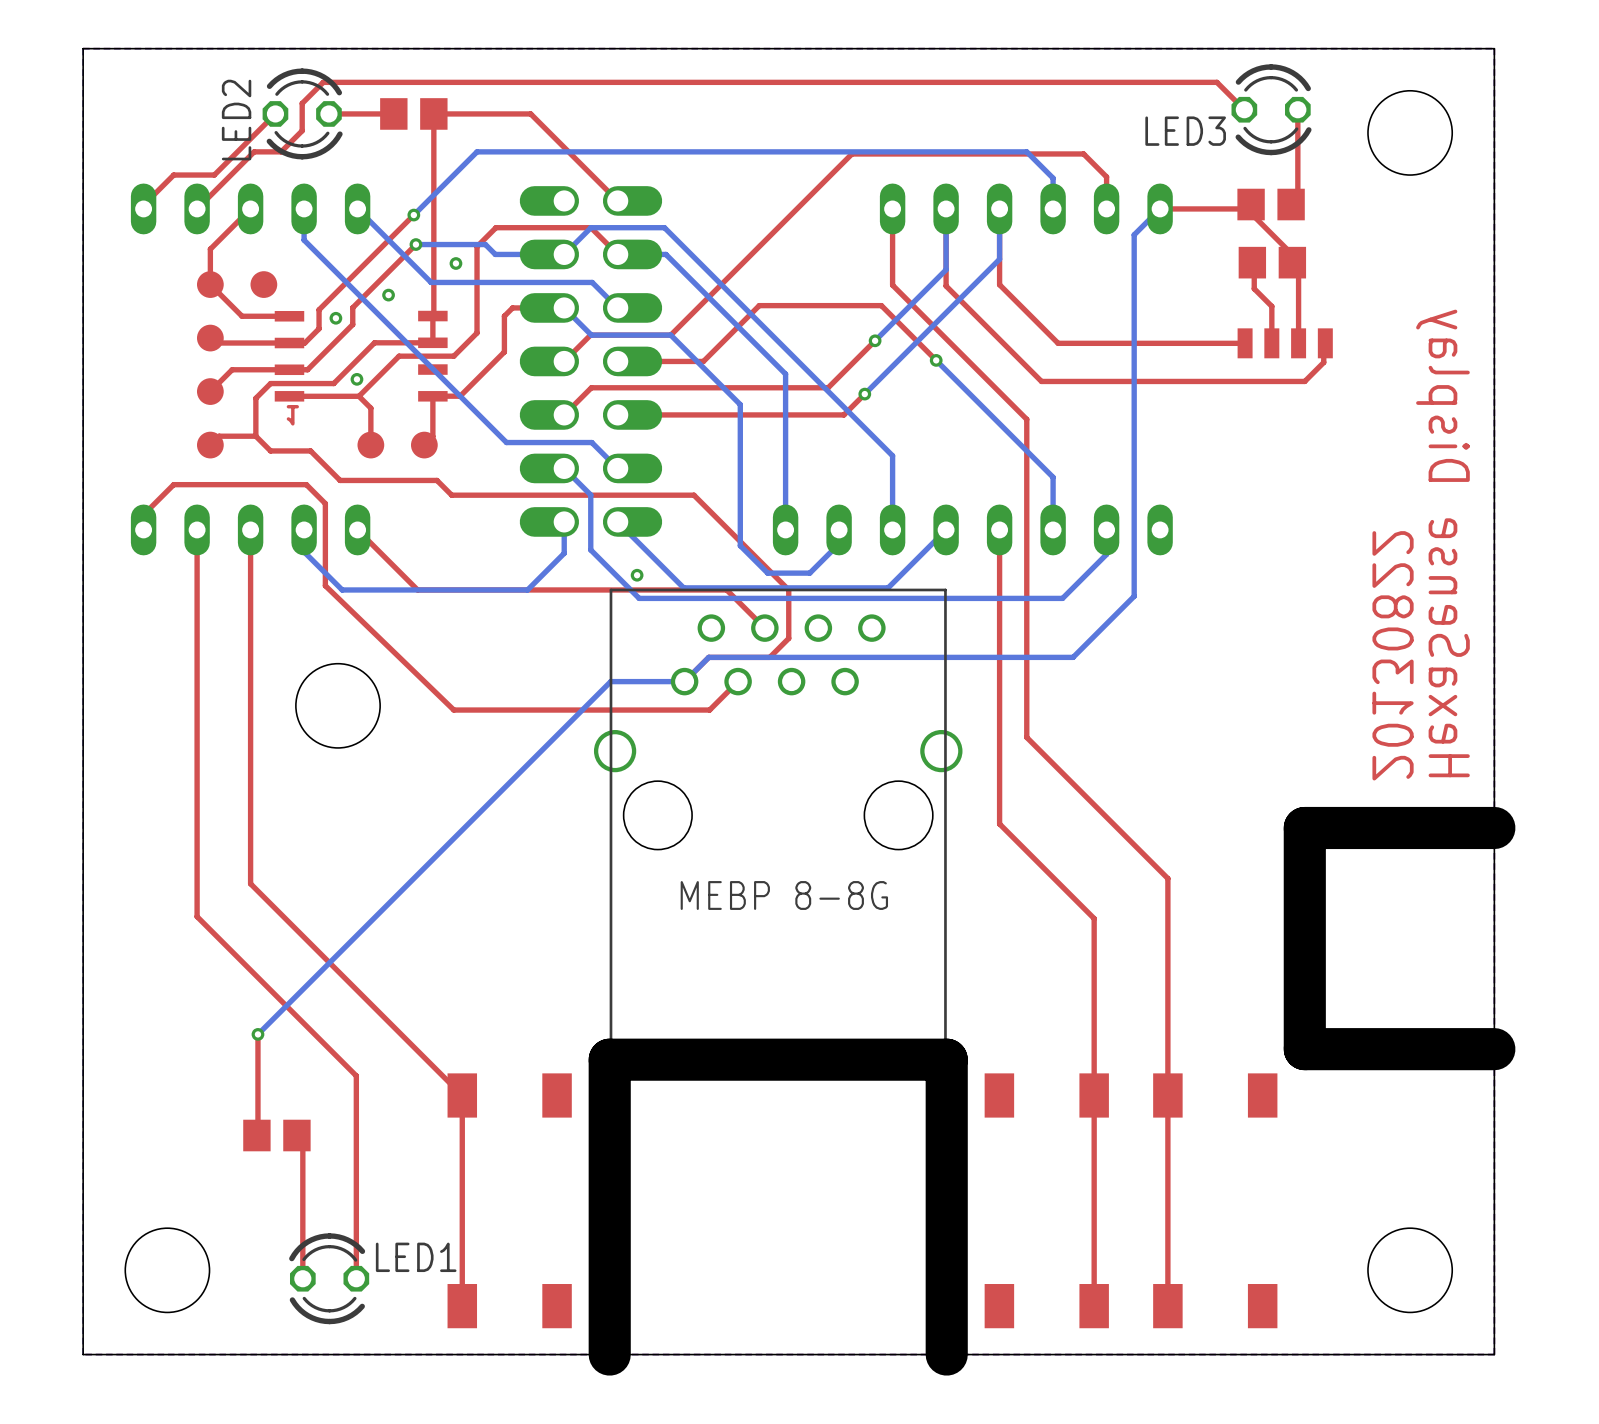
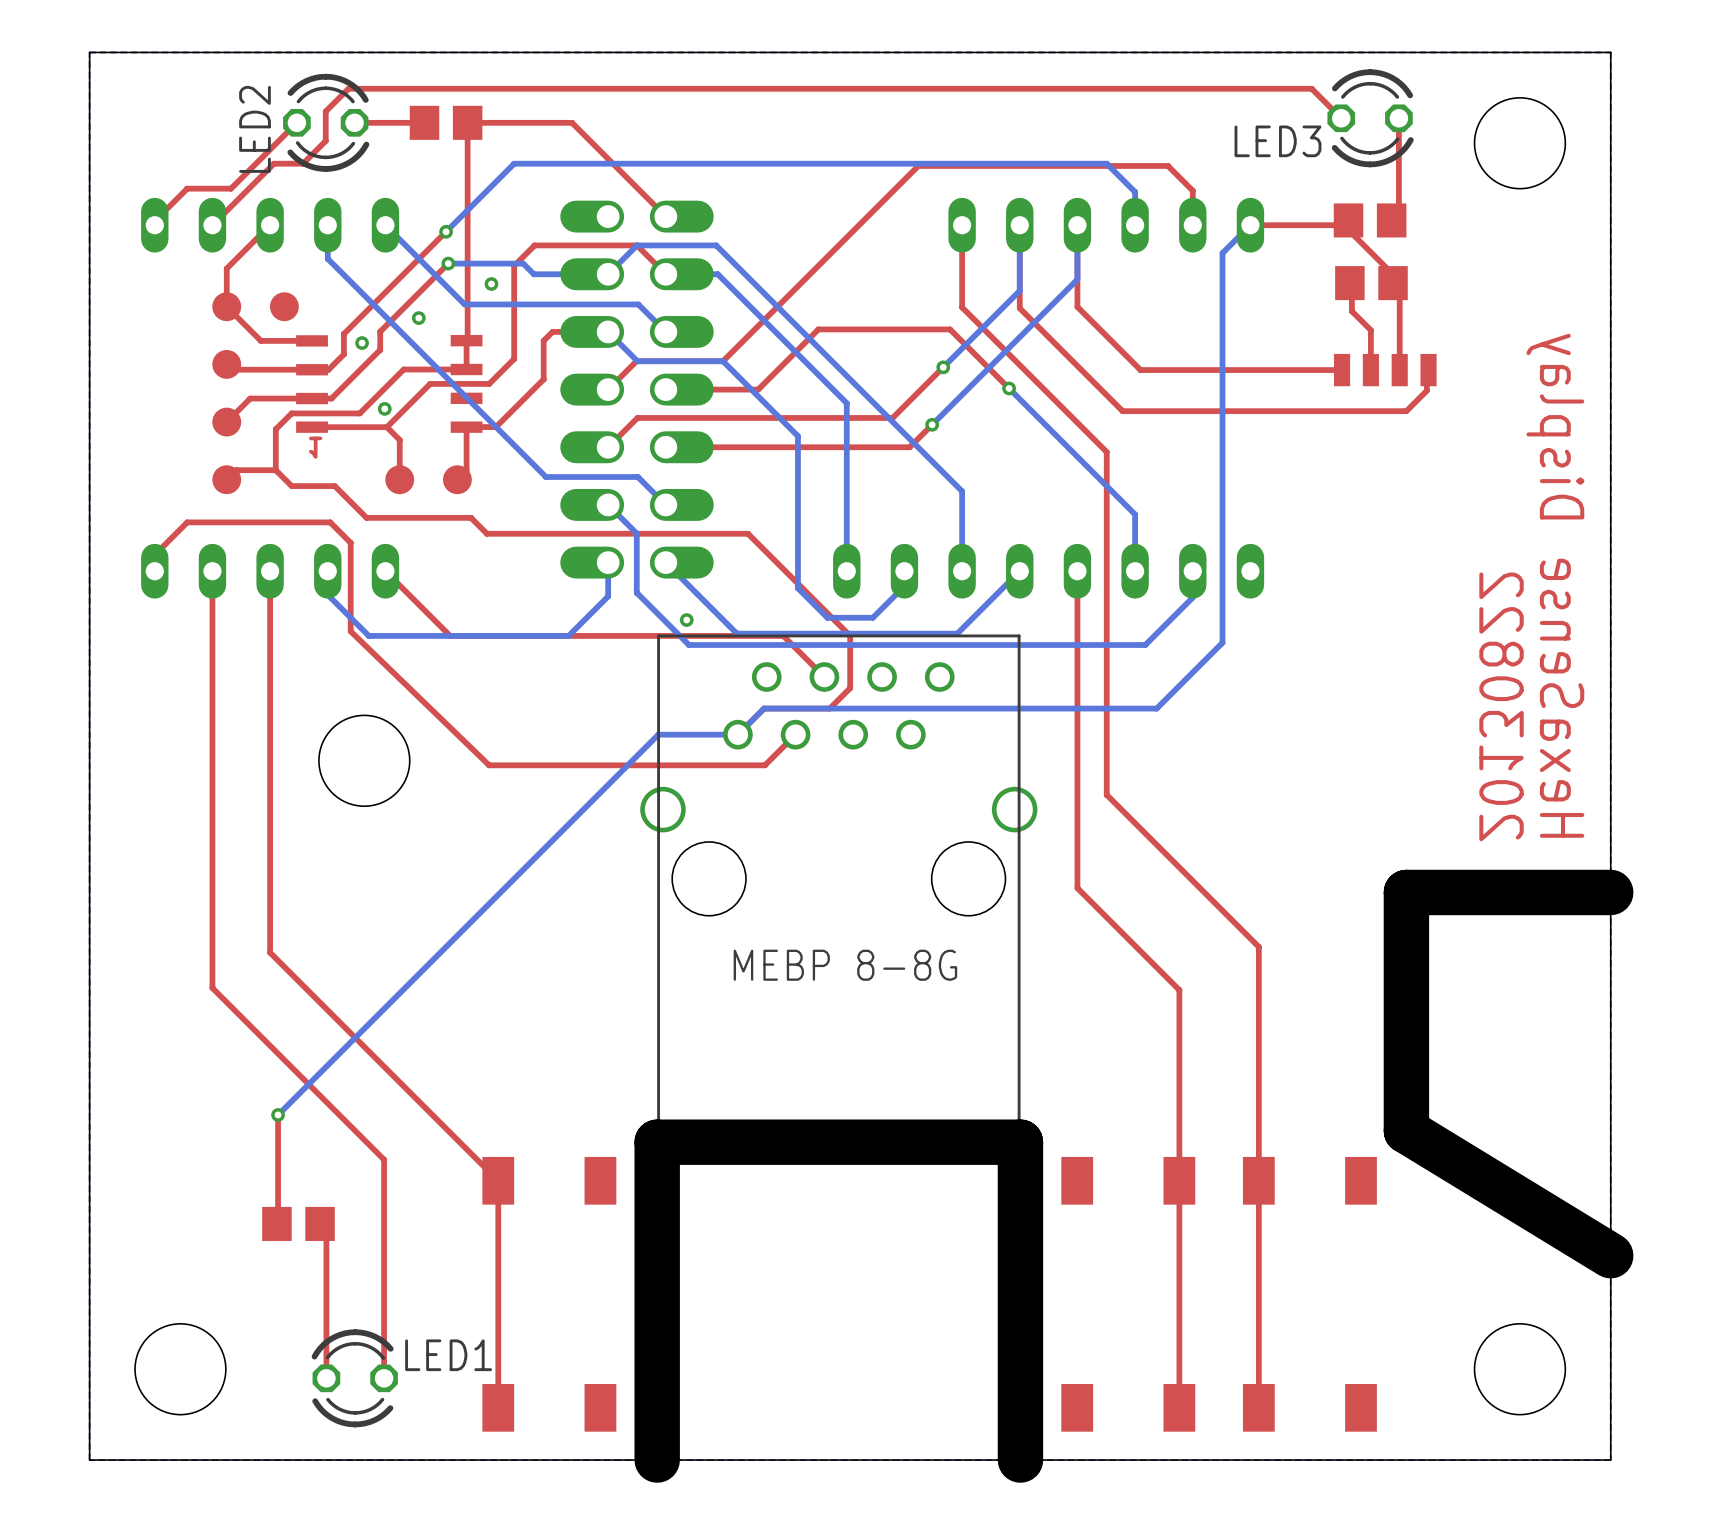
board edge: (1494, 1049) (1304, 1049) -> (1610, 1255) (1406, 1130)

